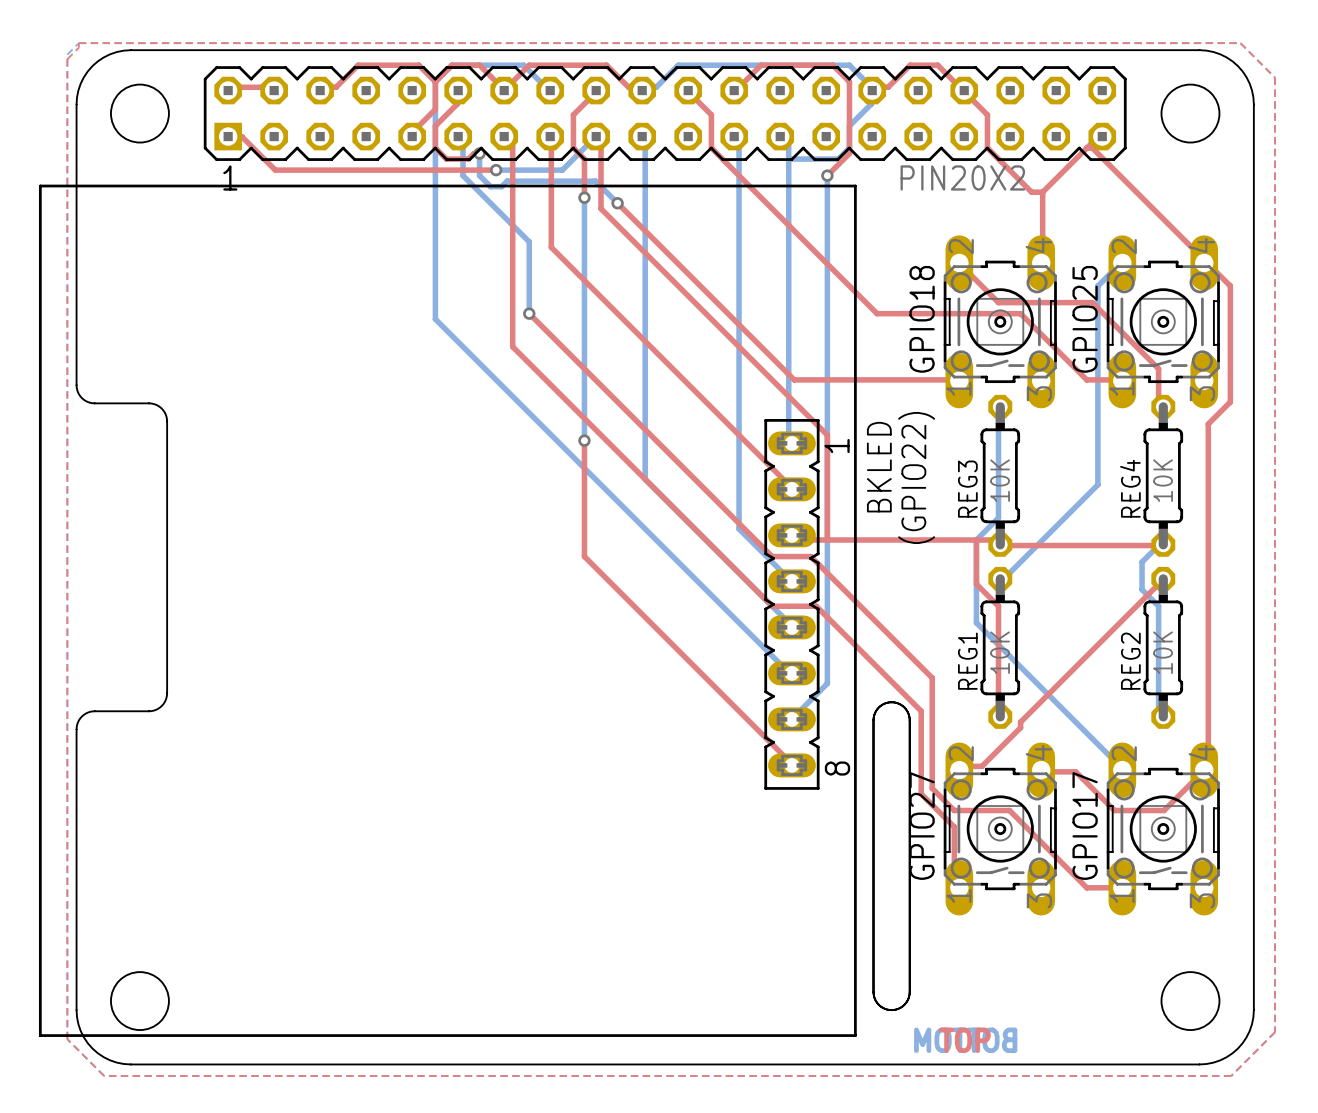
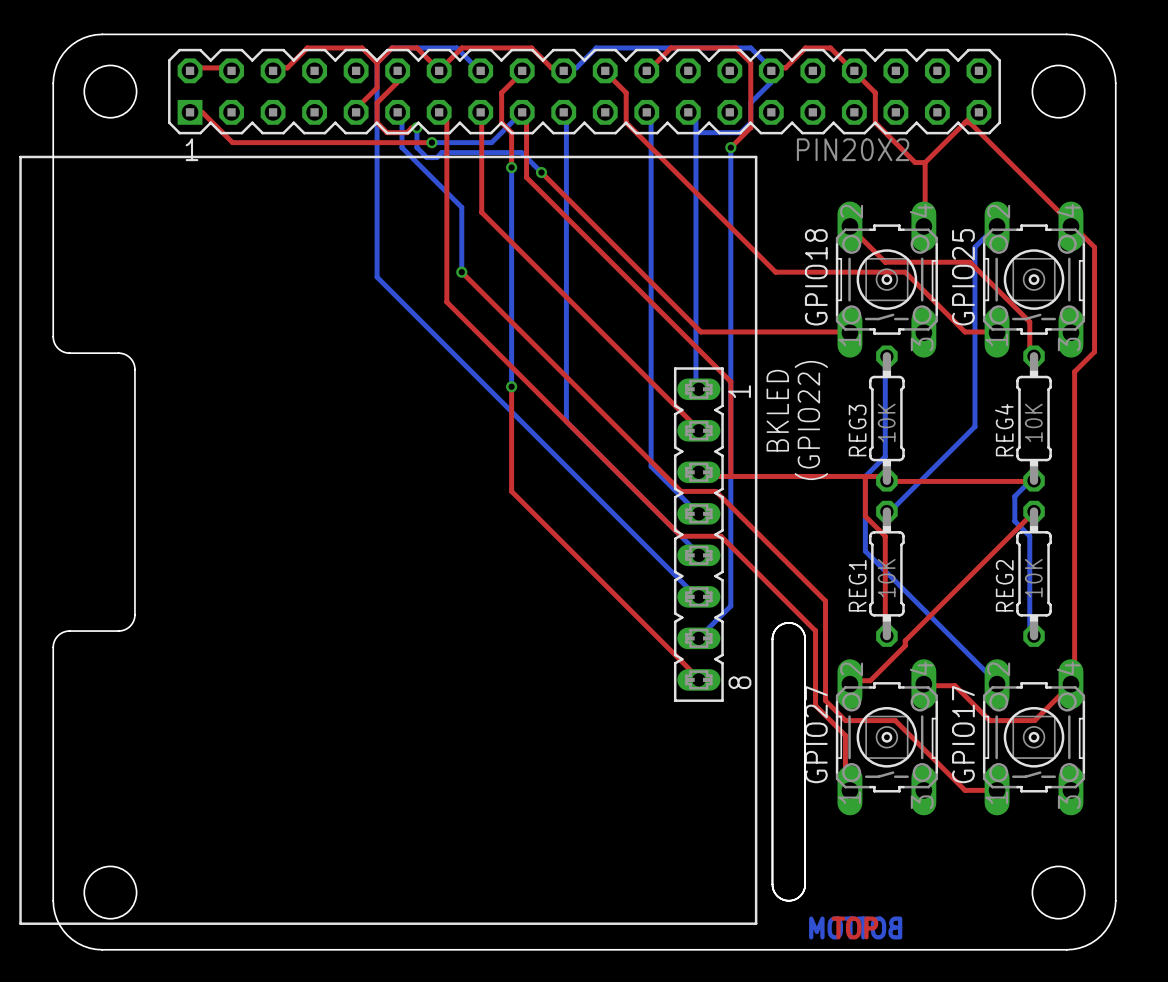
top zone outline: (78, 43) (1240, 43) (1275, 77) (1275, 1032) (1231, 1075) (104, 1075) (67, 1039) (67, 59) (78, 47) (78, 43) -> none

